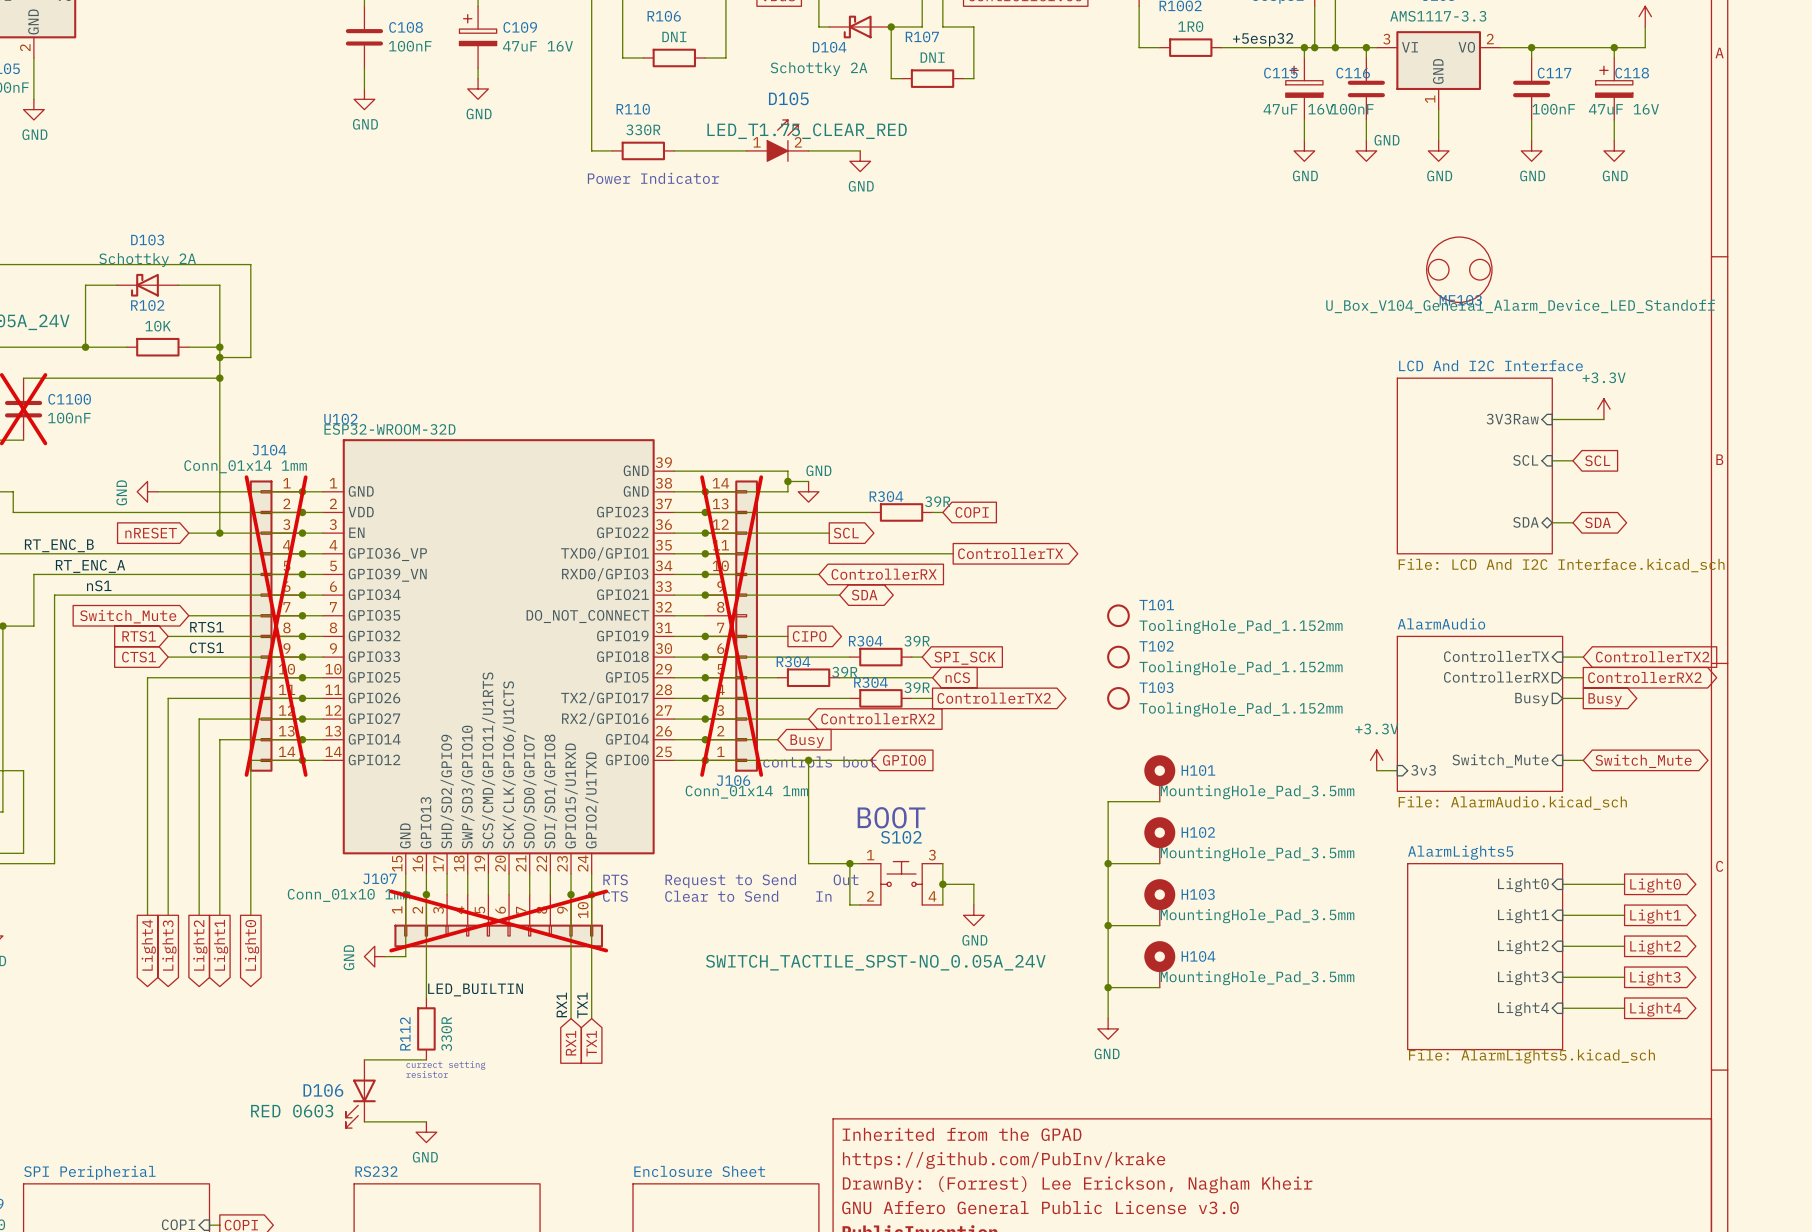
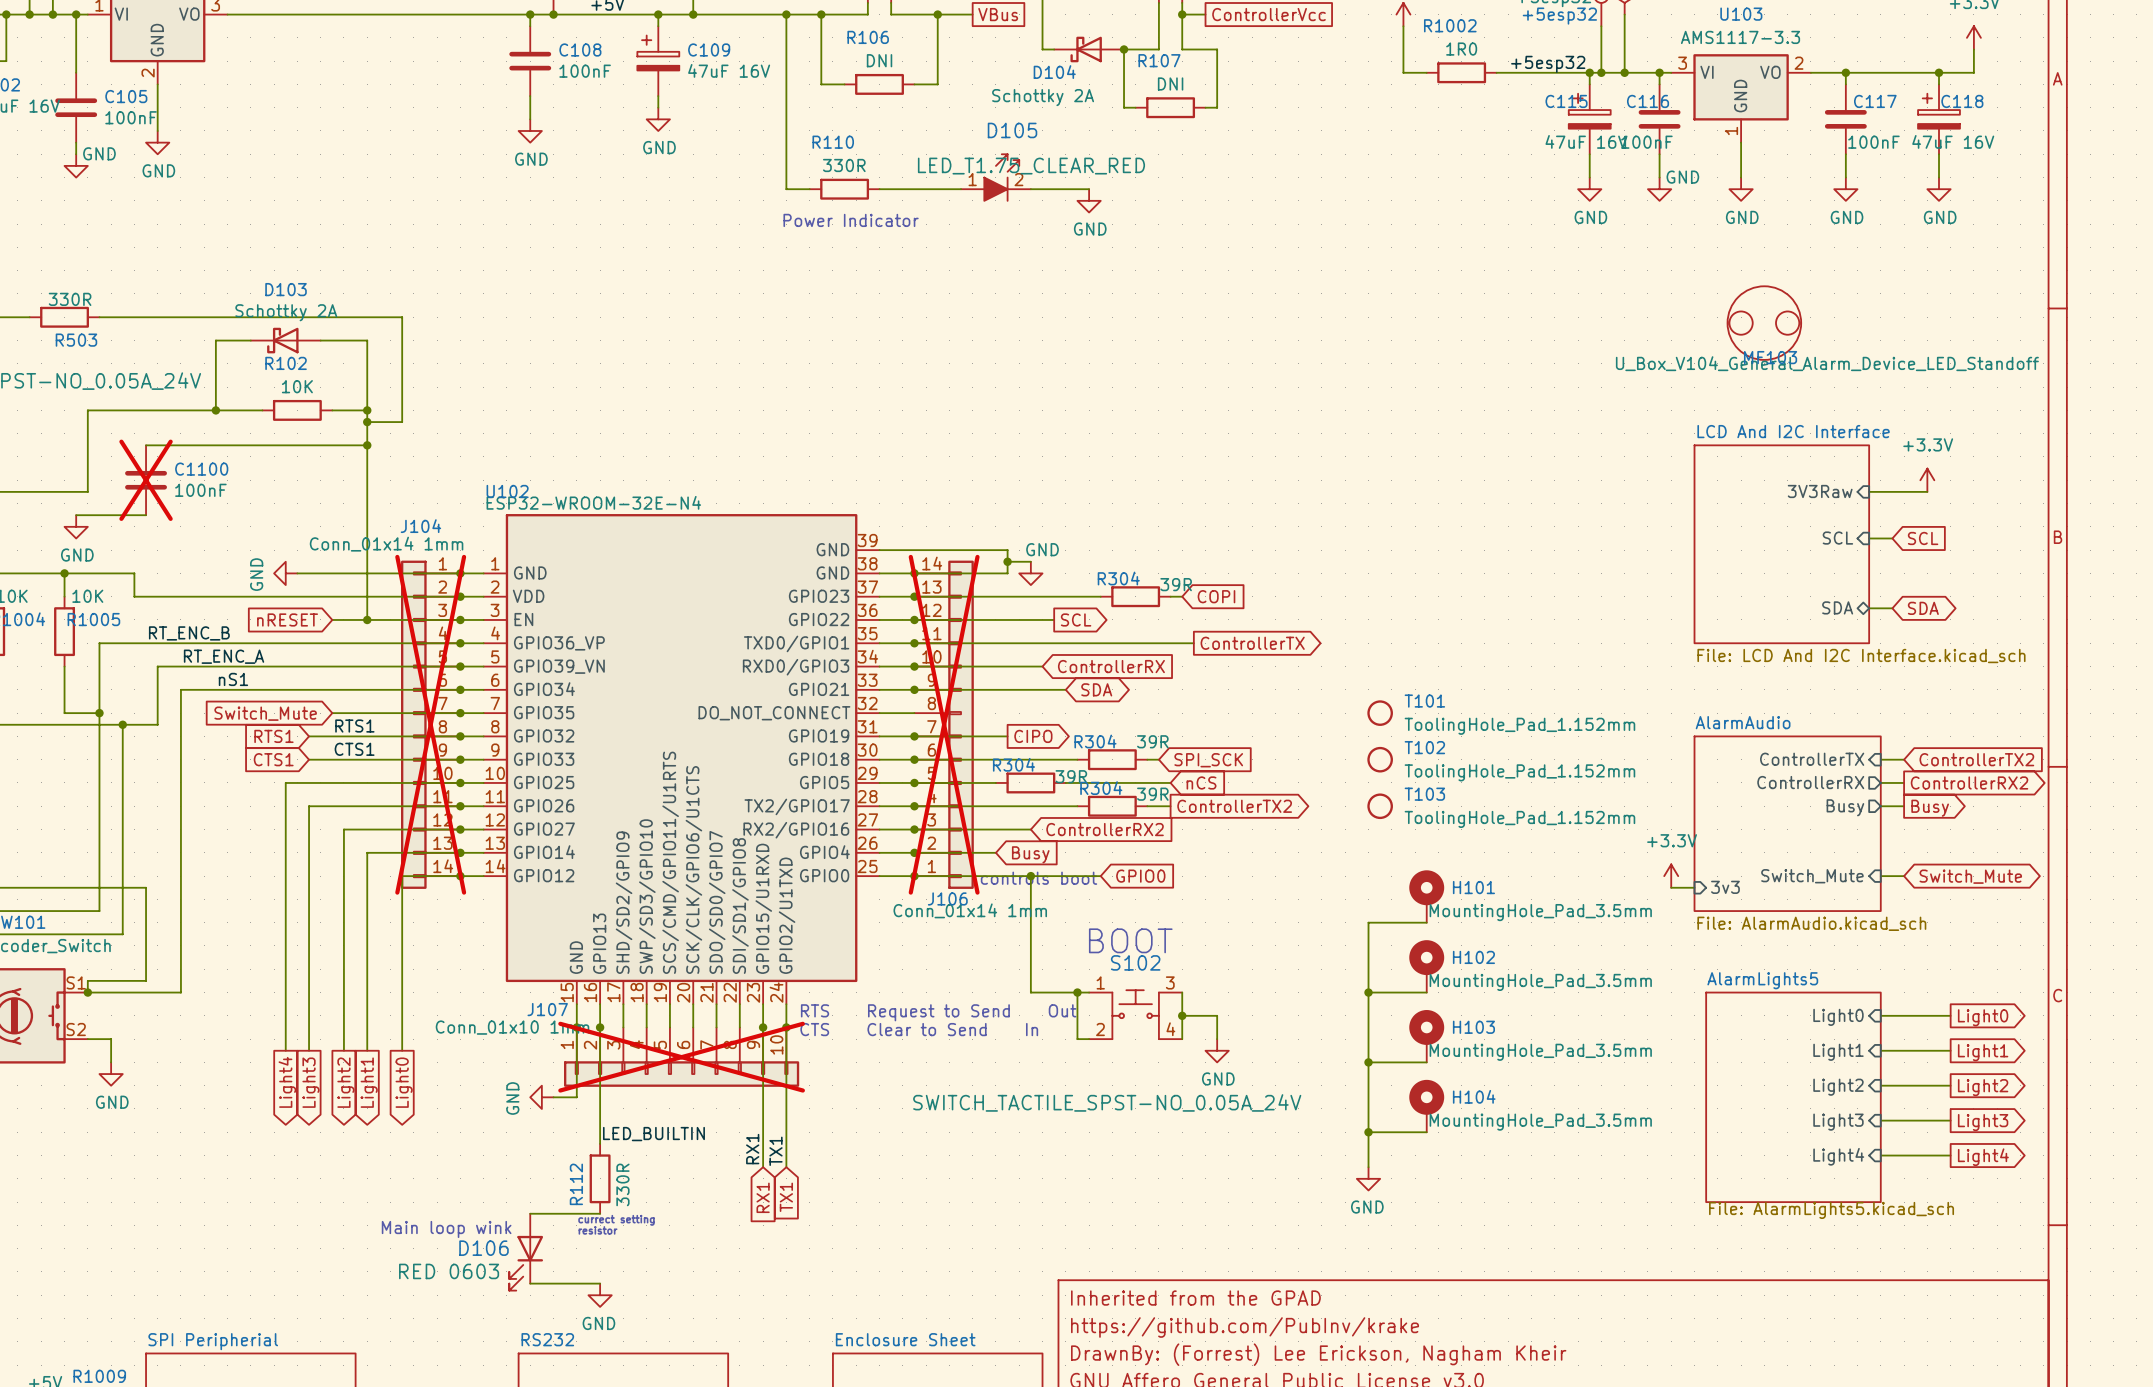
U102 value: ESP32-WROOM-32D (389, 429) -> ESP32-WROOM-32E-N4 (593, 502)
text: none -> Main loop wink (446, 1229)

